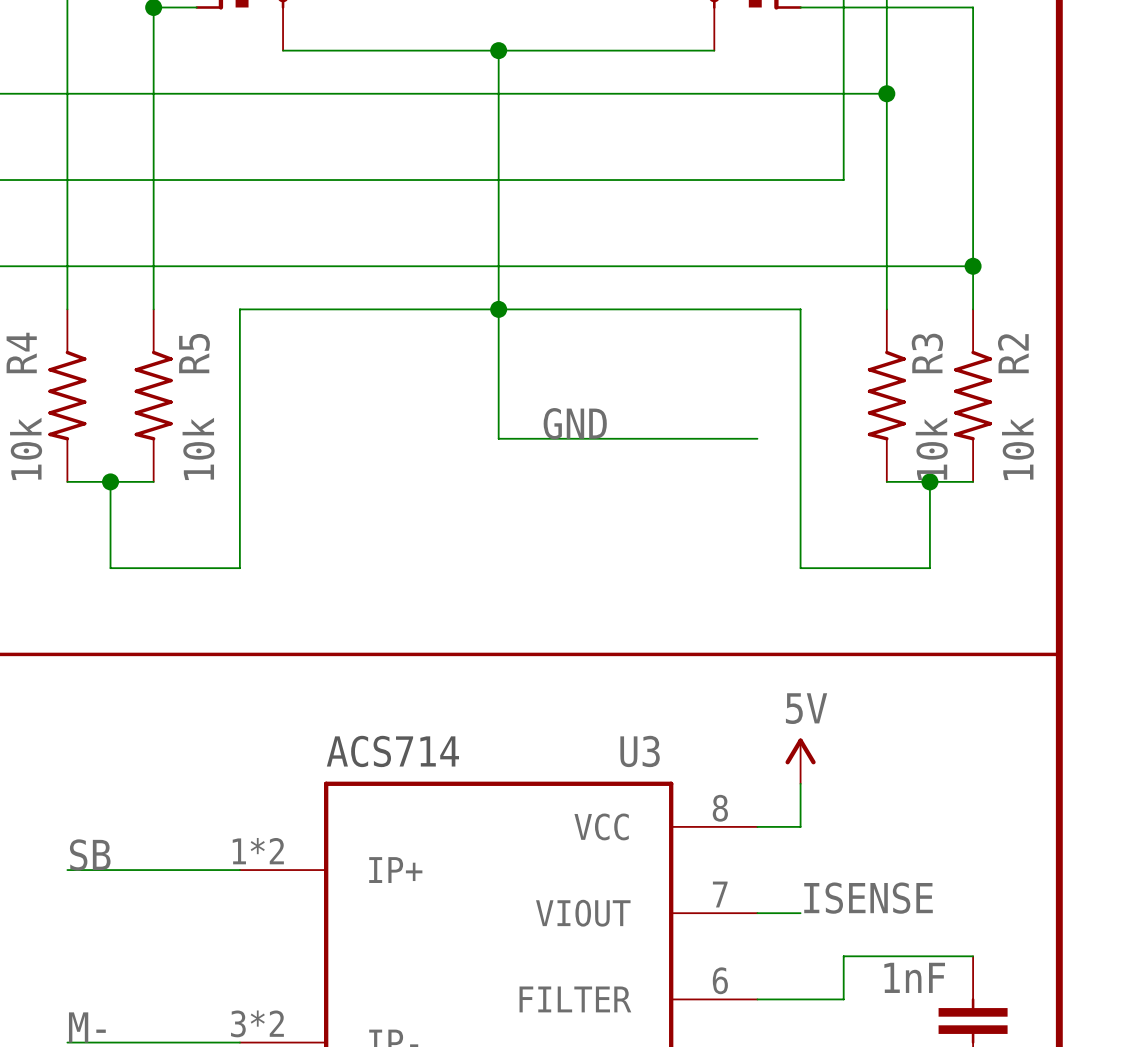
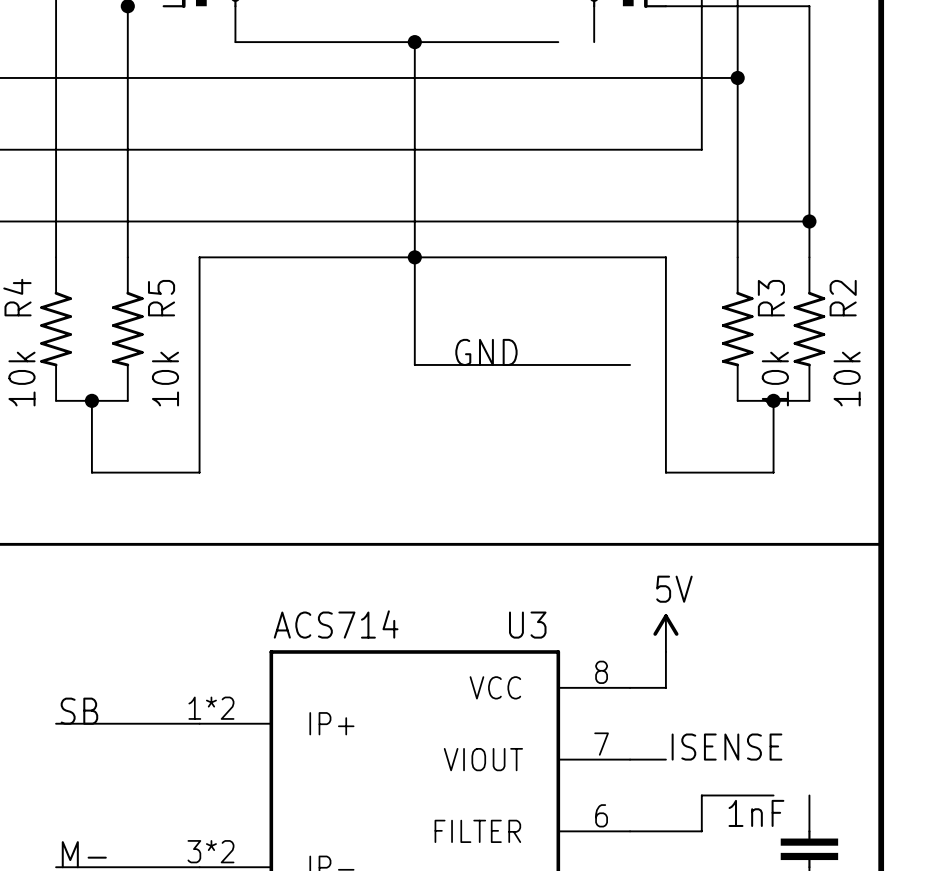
wire: (153, 7) (196, 7) -> none
wire: (671, 50) (714, 50) -> none
wire: (929, 956) (973, 956) -> none

